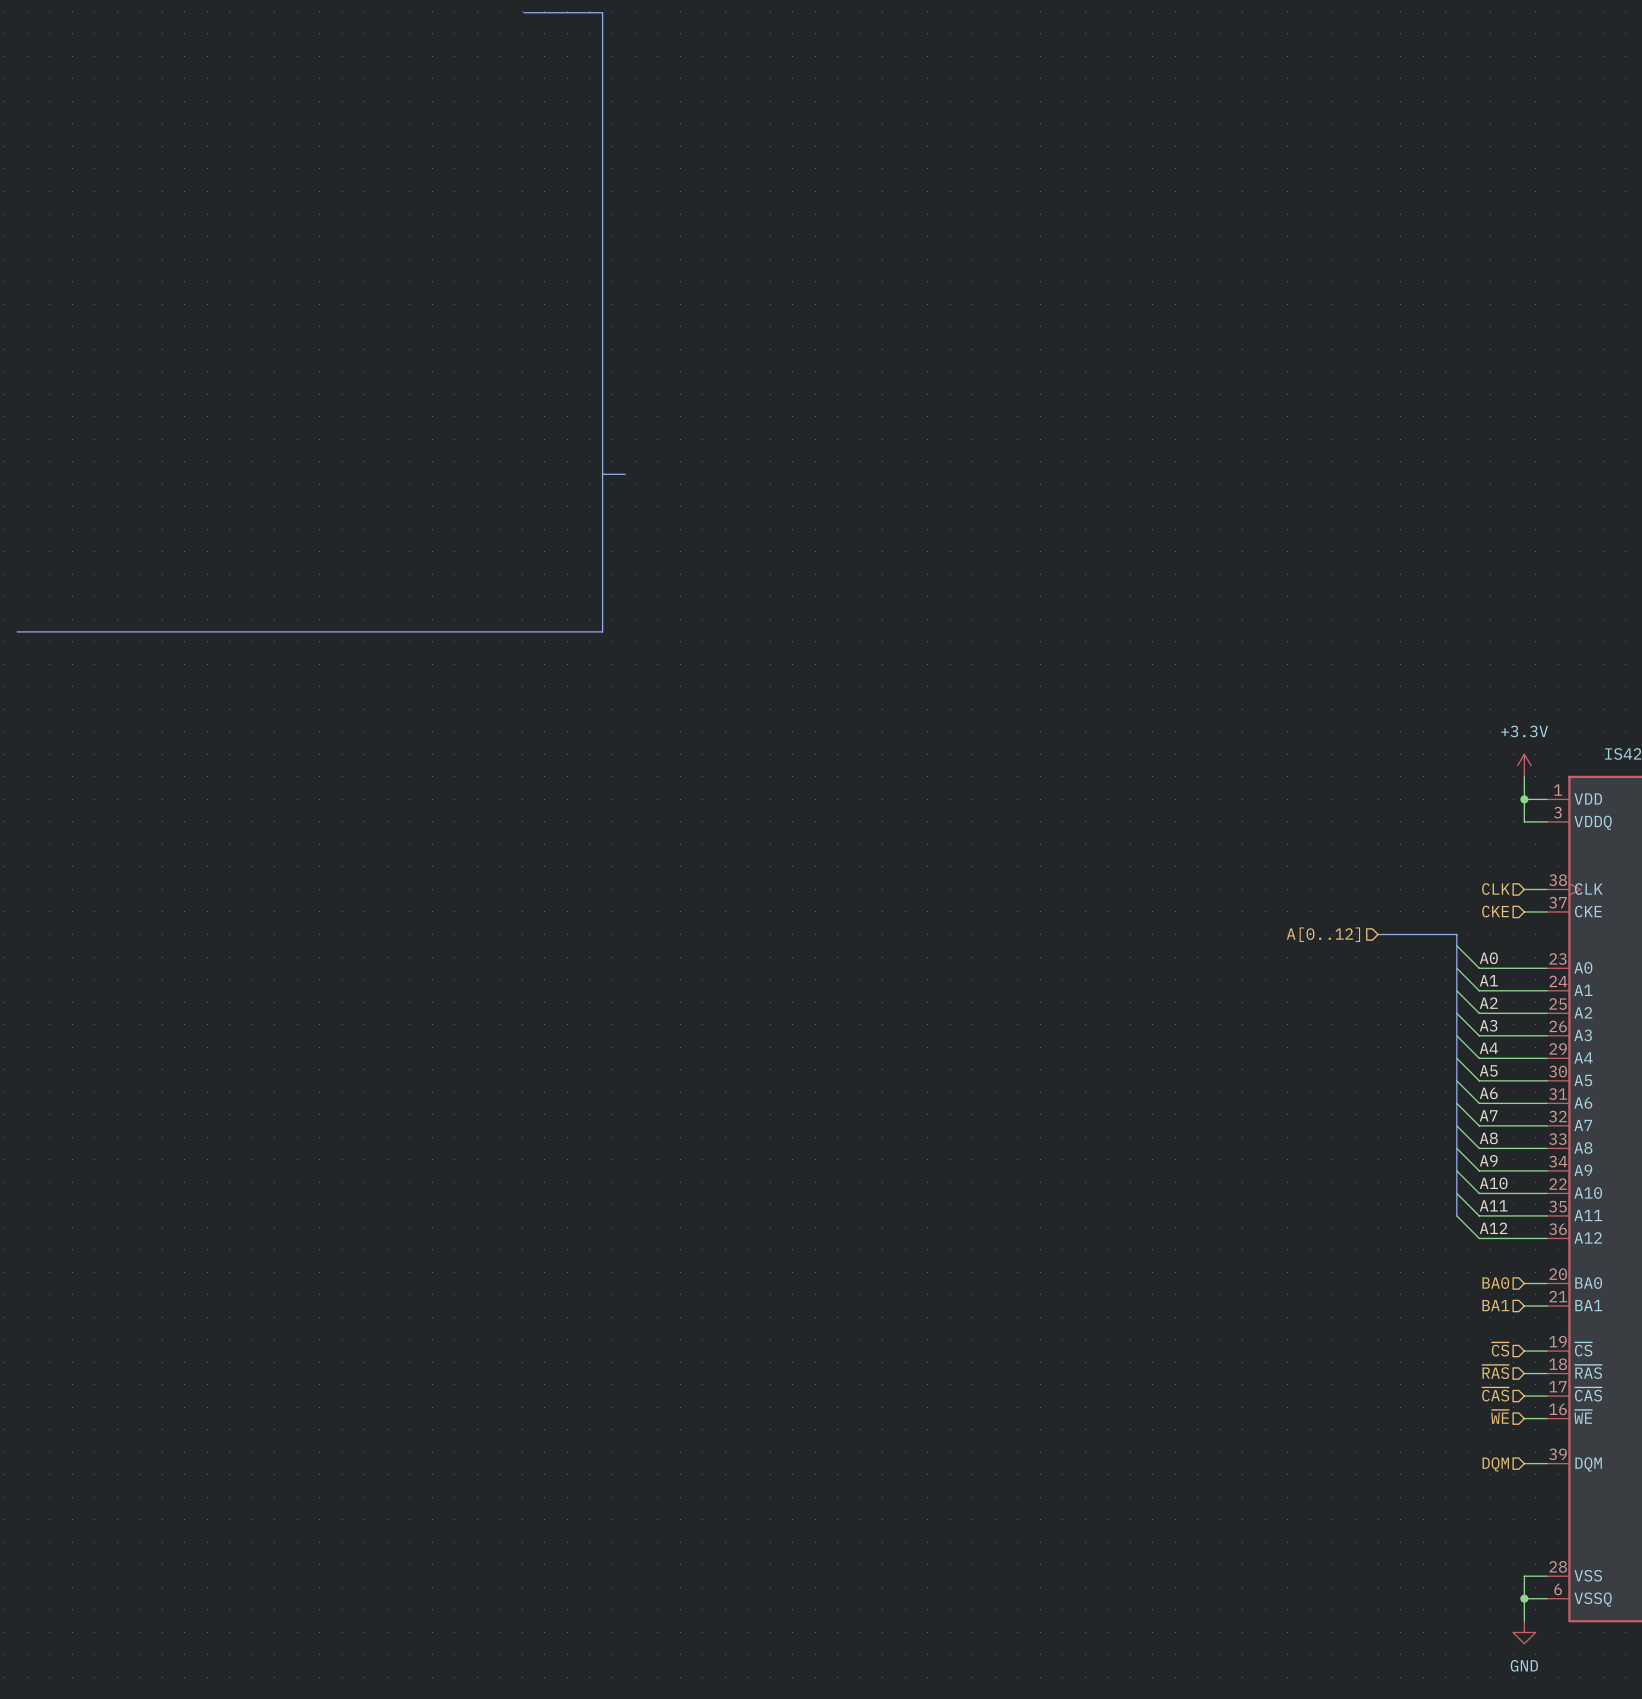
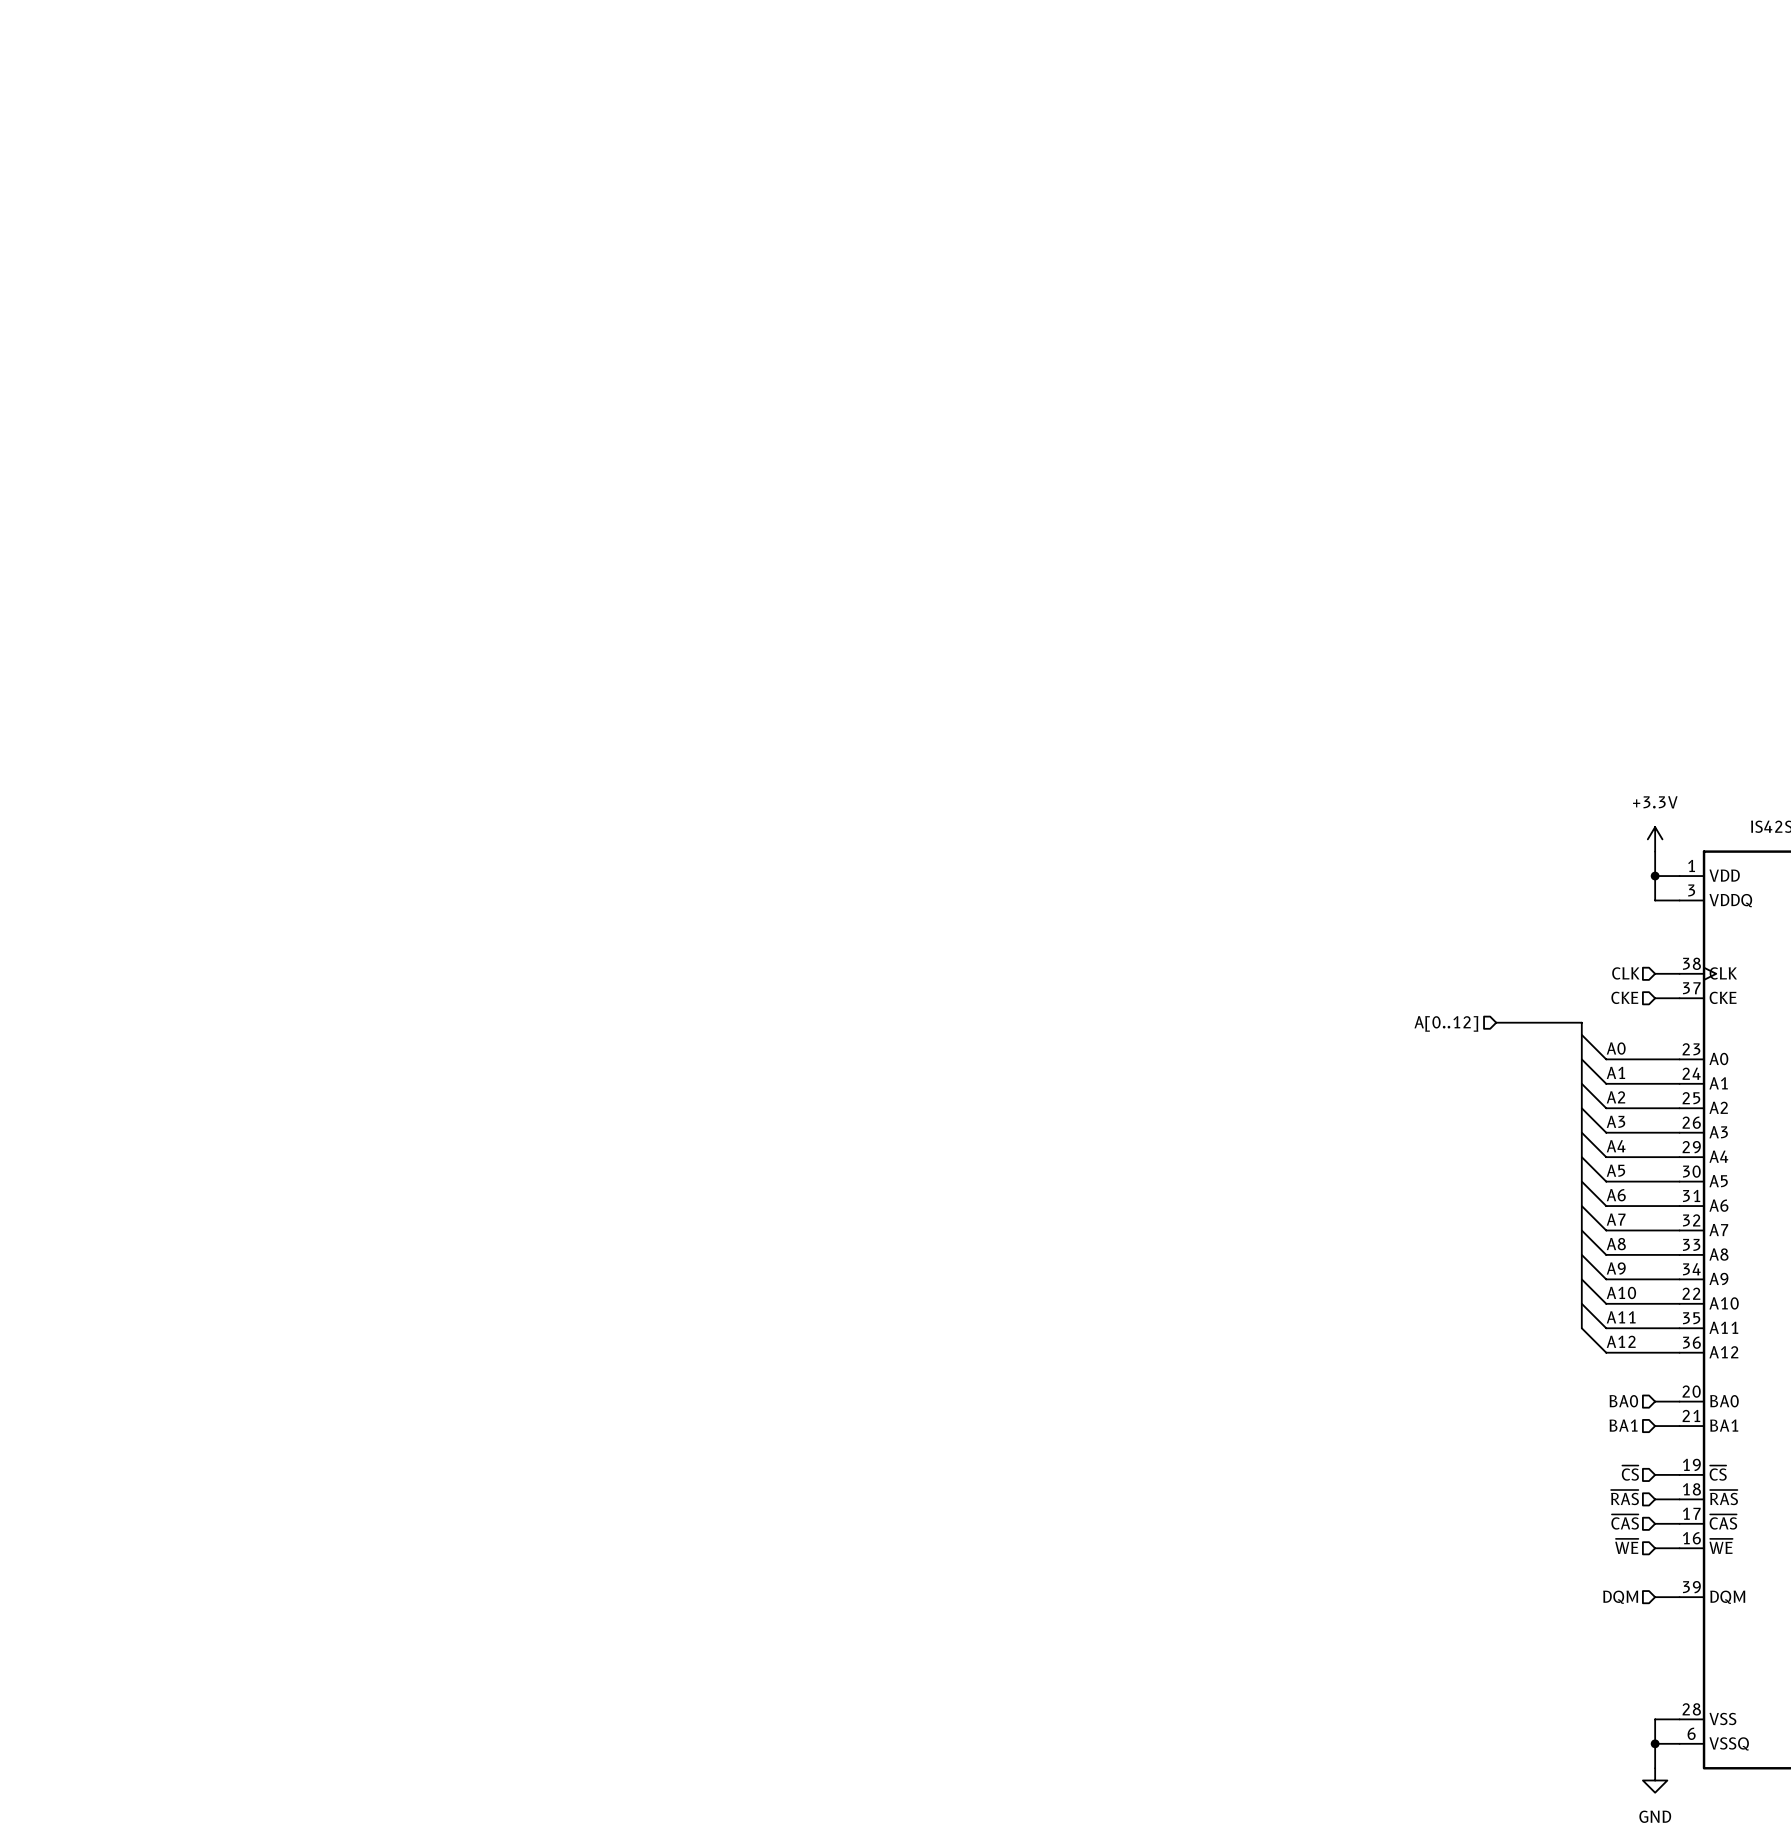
bus: (523, 12) (602, 12) (602, 631) (17, 631) -> none
bus: (602, 474) (625, 474) -> none

